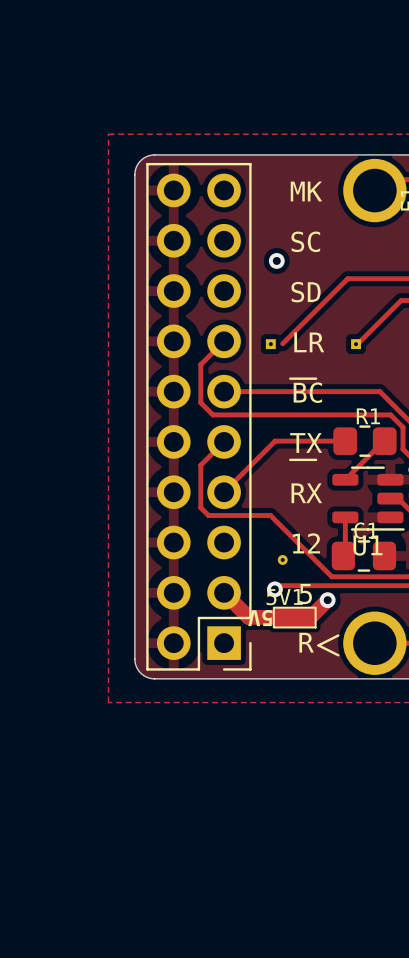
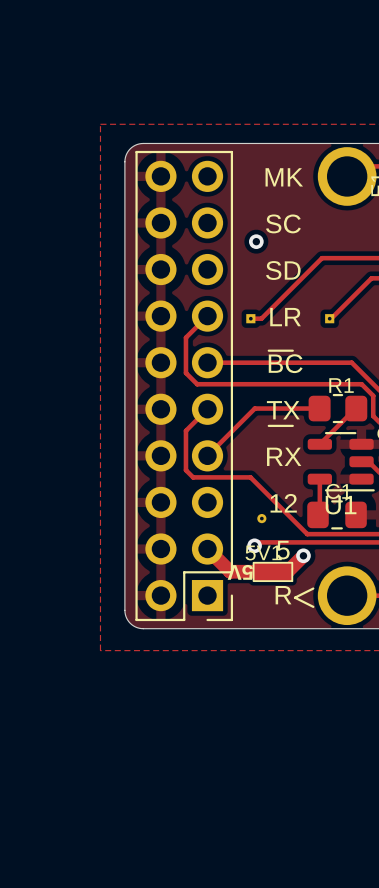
track: none -> (261, 318) (250, 318)

